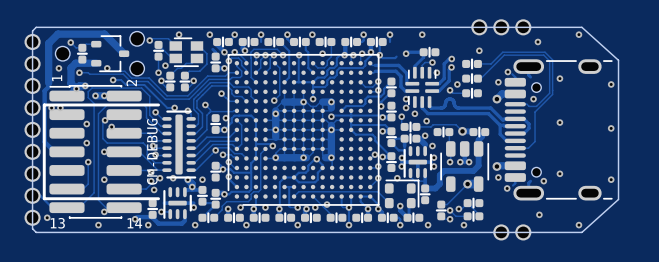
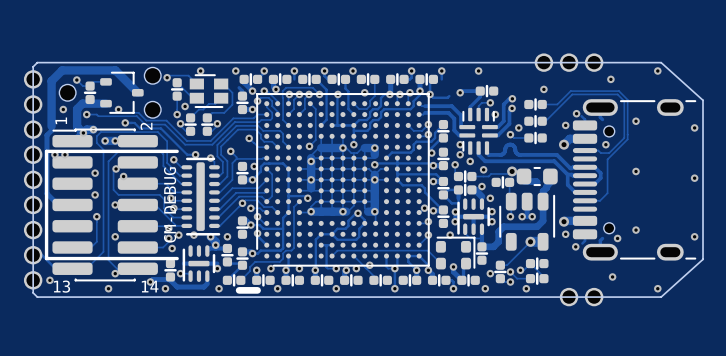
part footprint: [469, 126, 490, 138] -> [516, 166, 558, 187]
via position: (462, 131) -> (512, 171)
via: none -> (490, 273)
line: none -> (239, 290) (257, 290)

